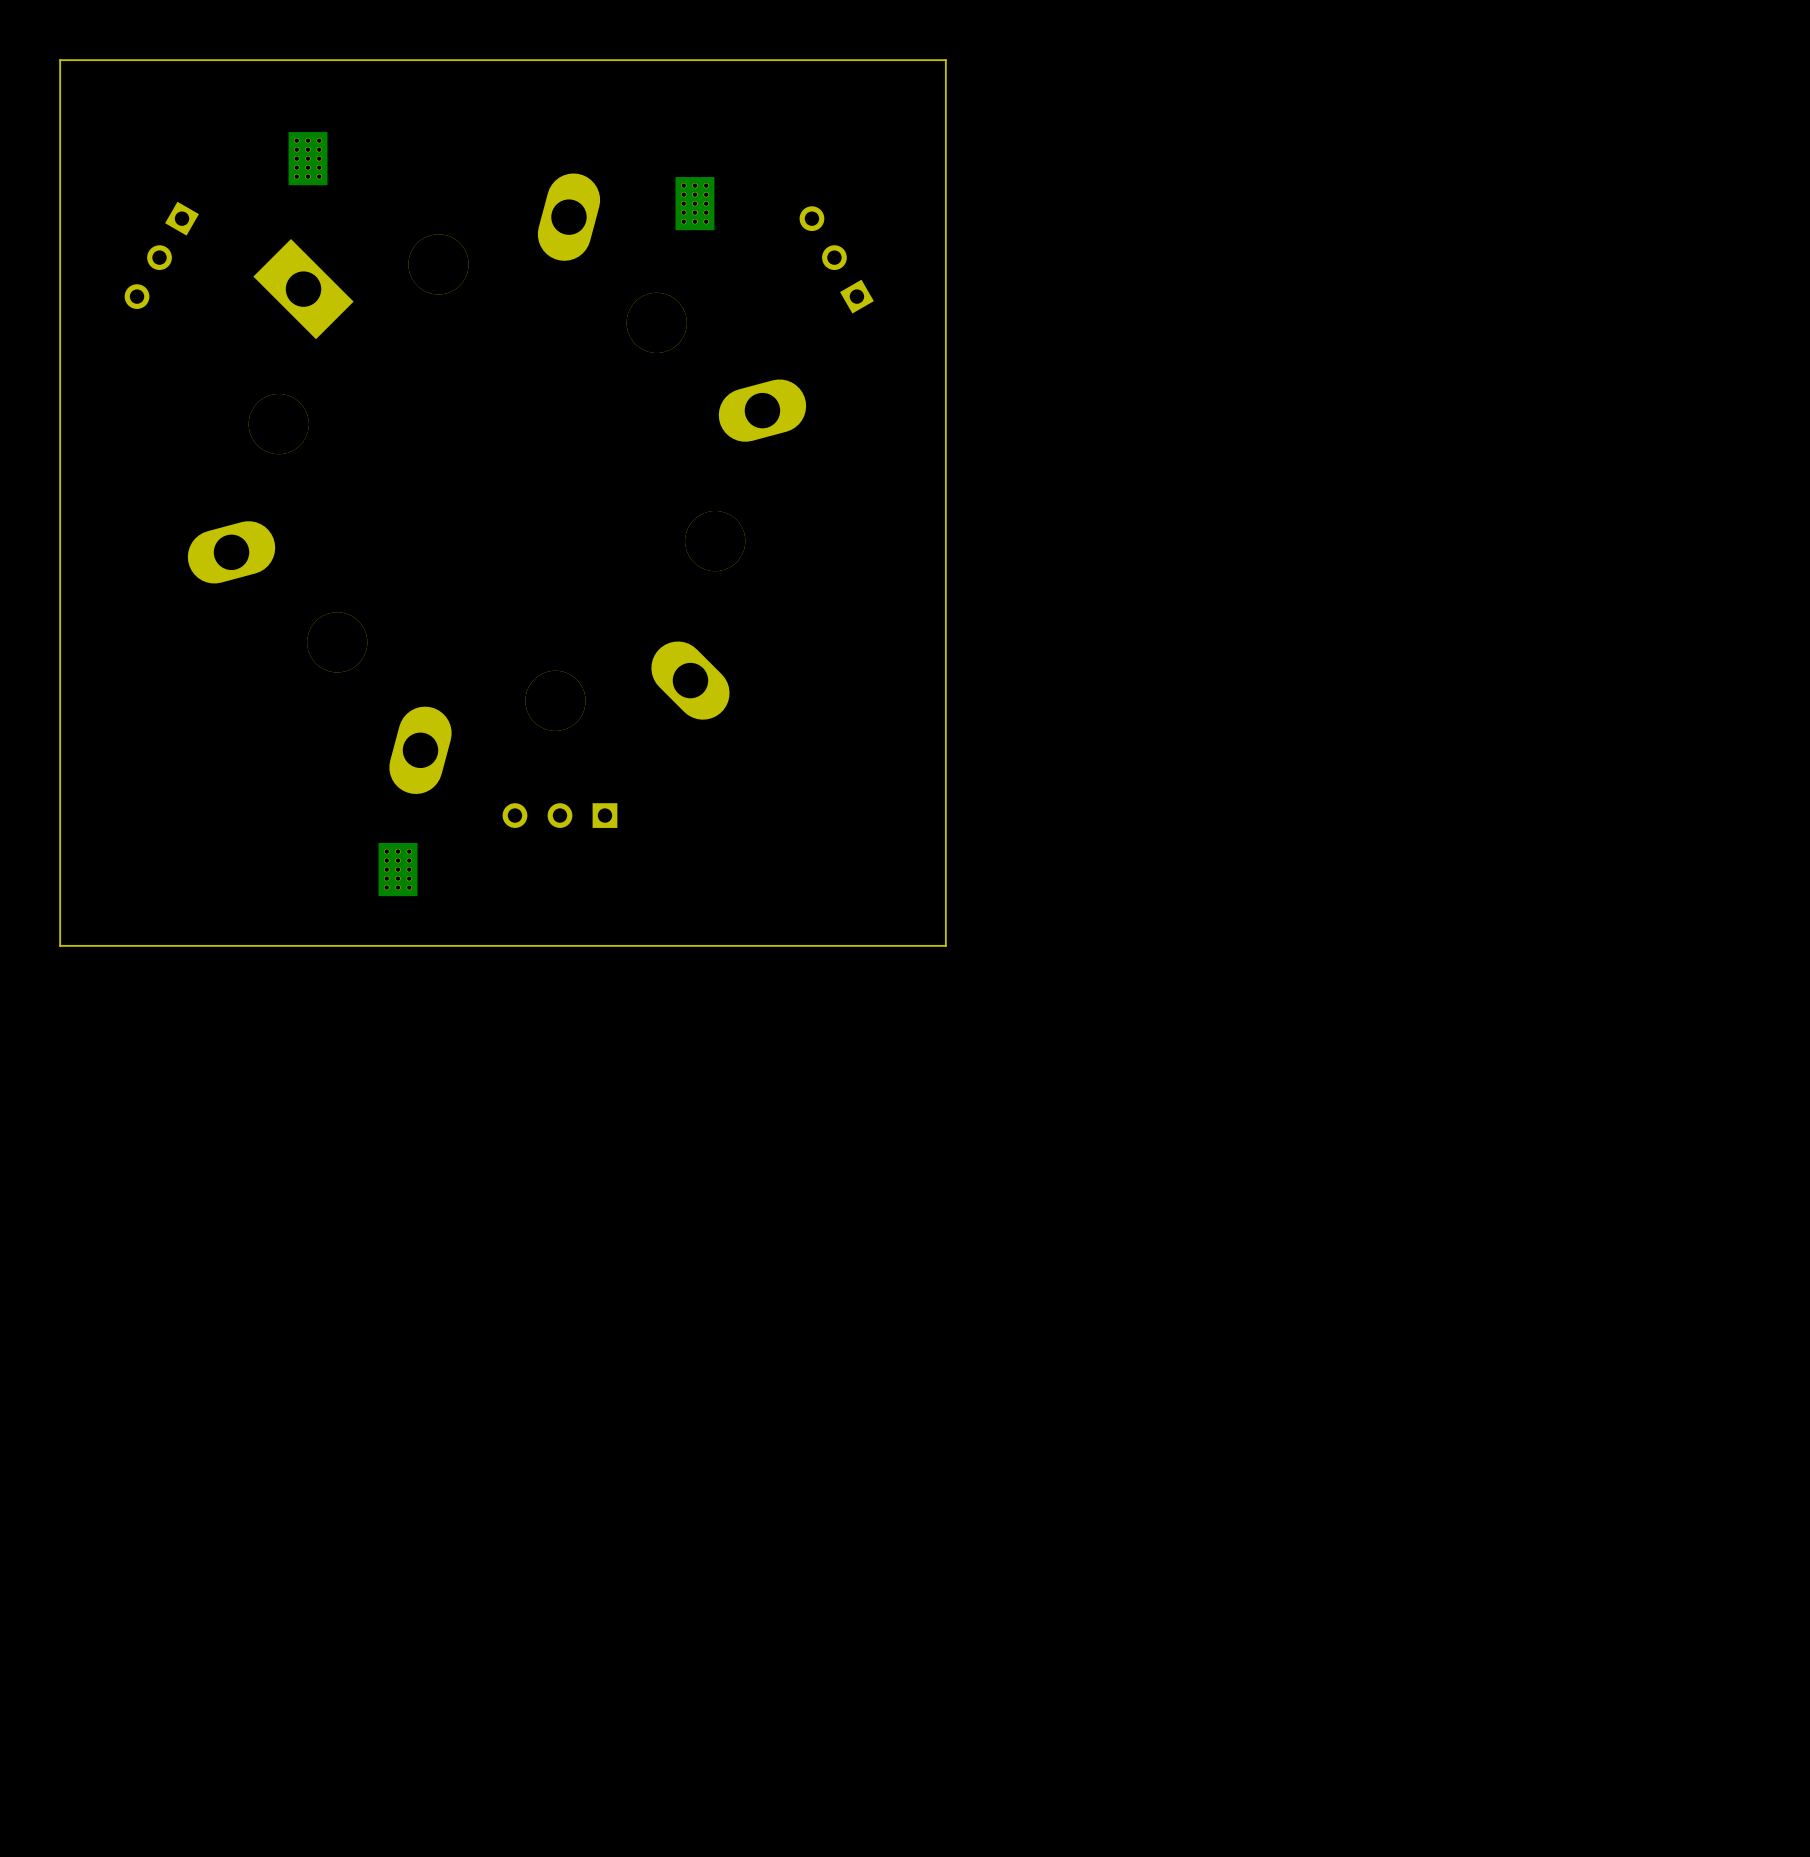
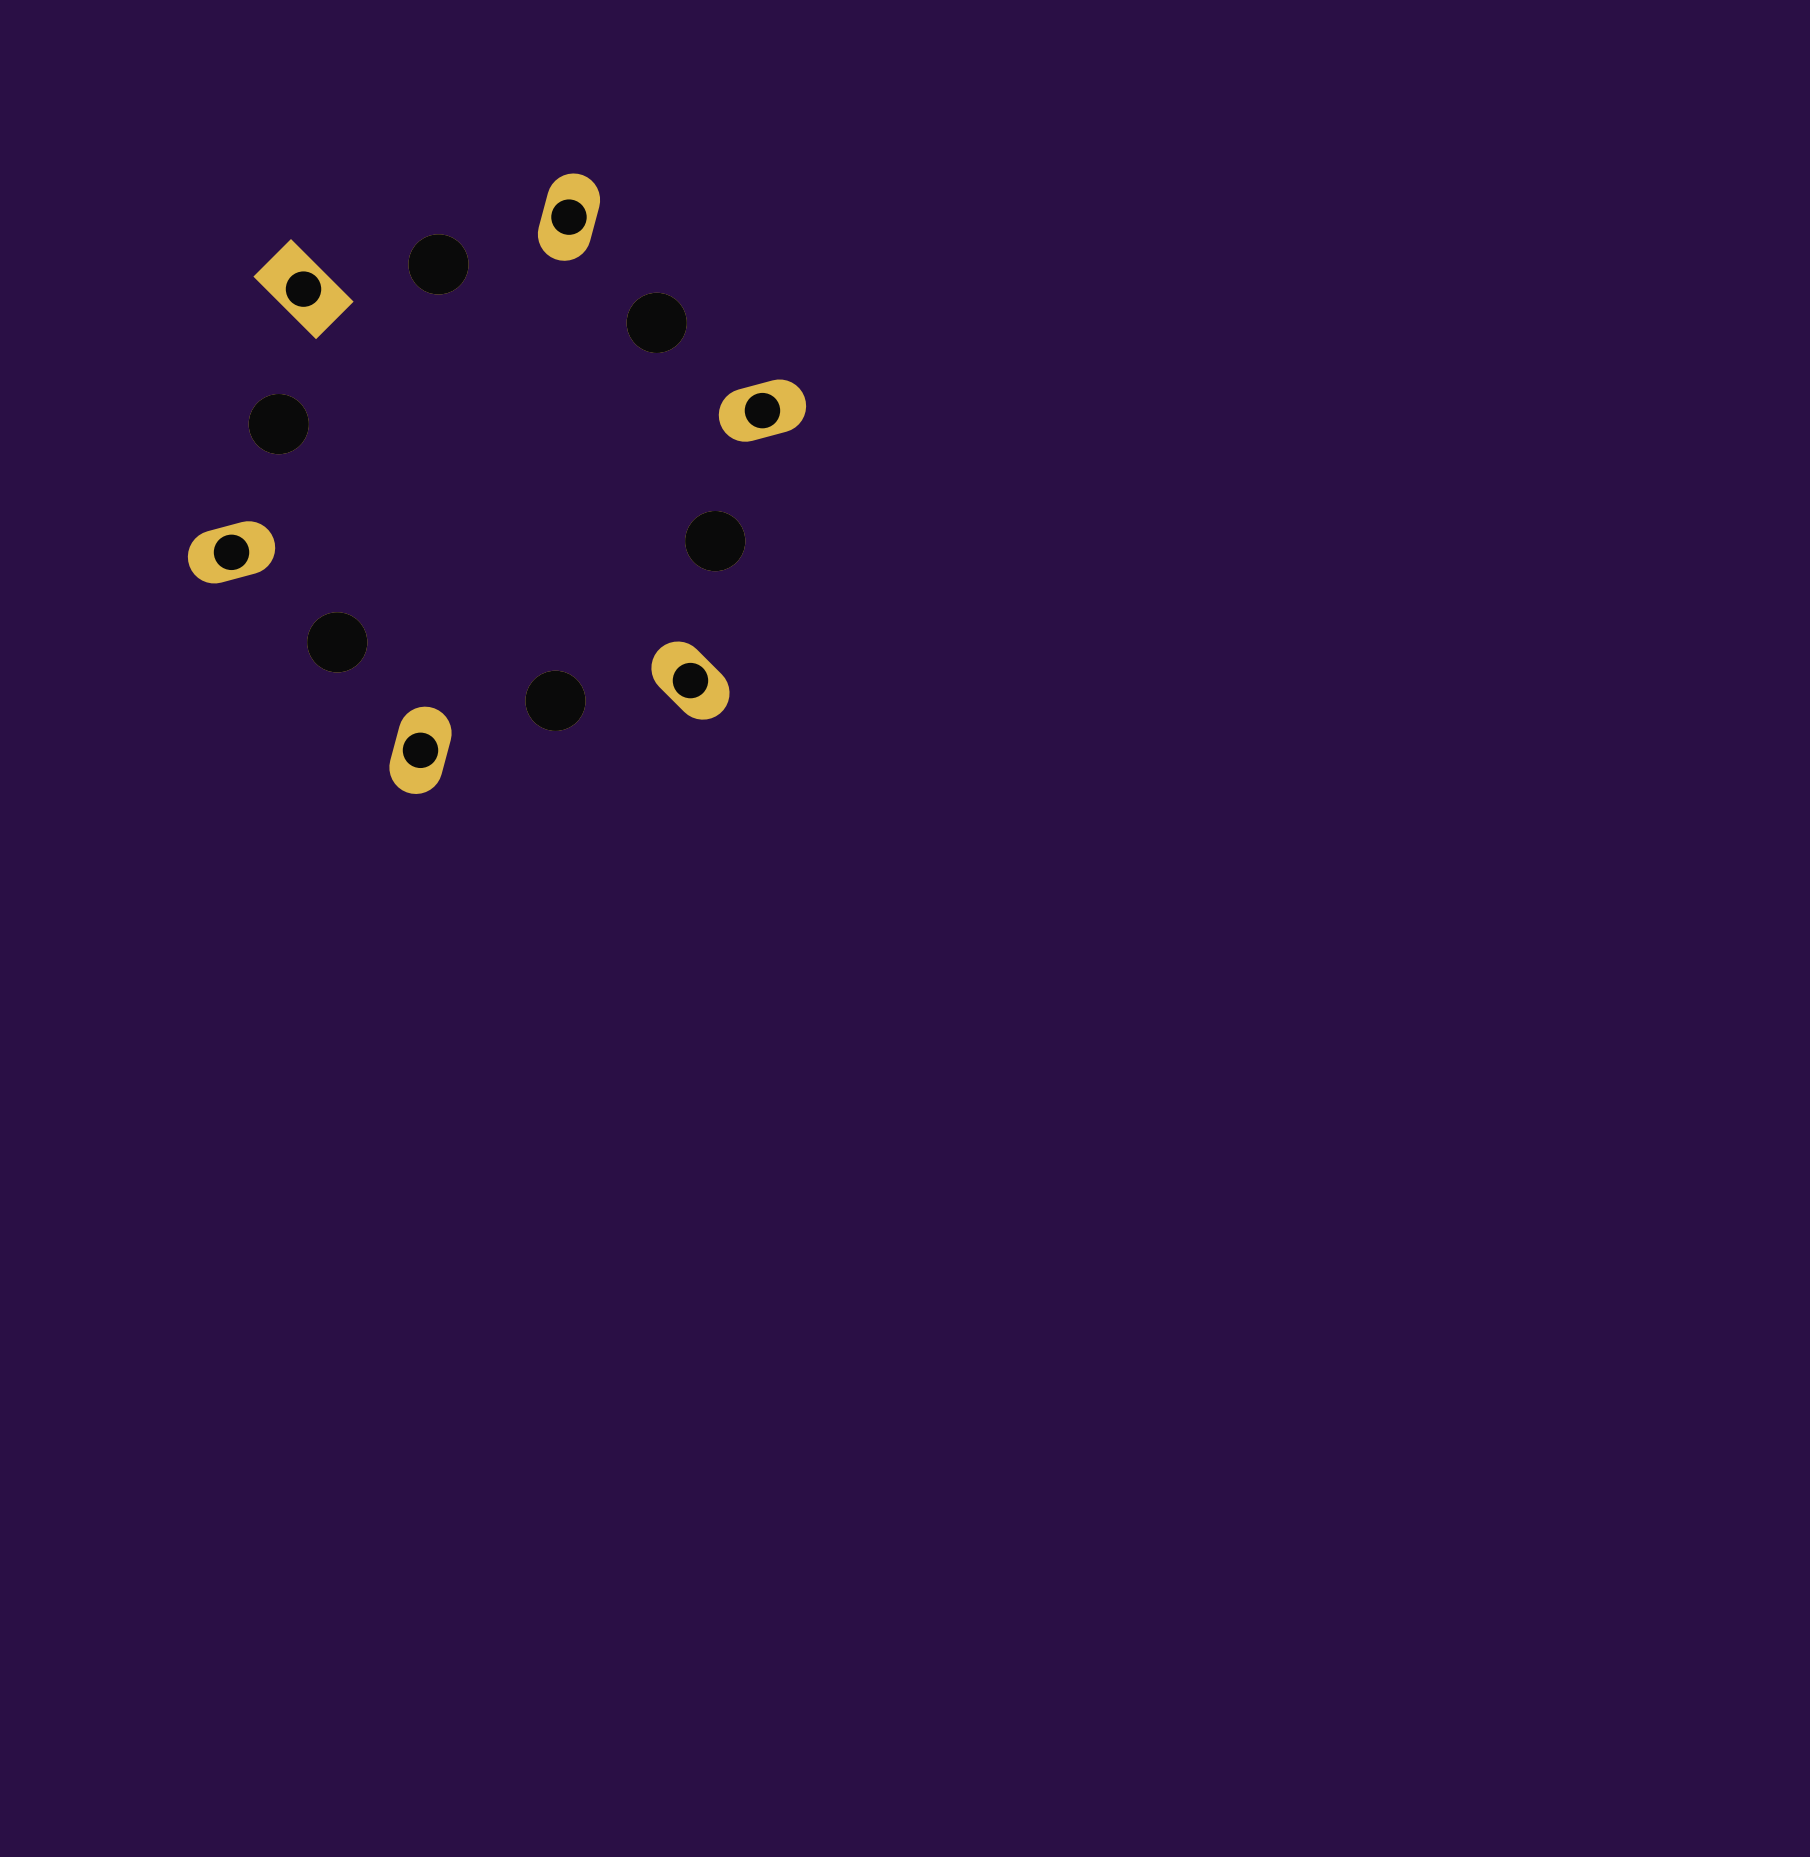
board edge: (945, 60) (945, 945) (60, 945) (60, 60) (945, 60) -> none
part: (308, 158) -> none
part: (694, 203) -> none
part: (161, 255) -> none
part: (836, 259) -> none
part: (559, 815) -> none
part: (398, 869) -> none

